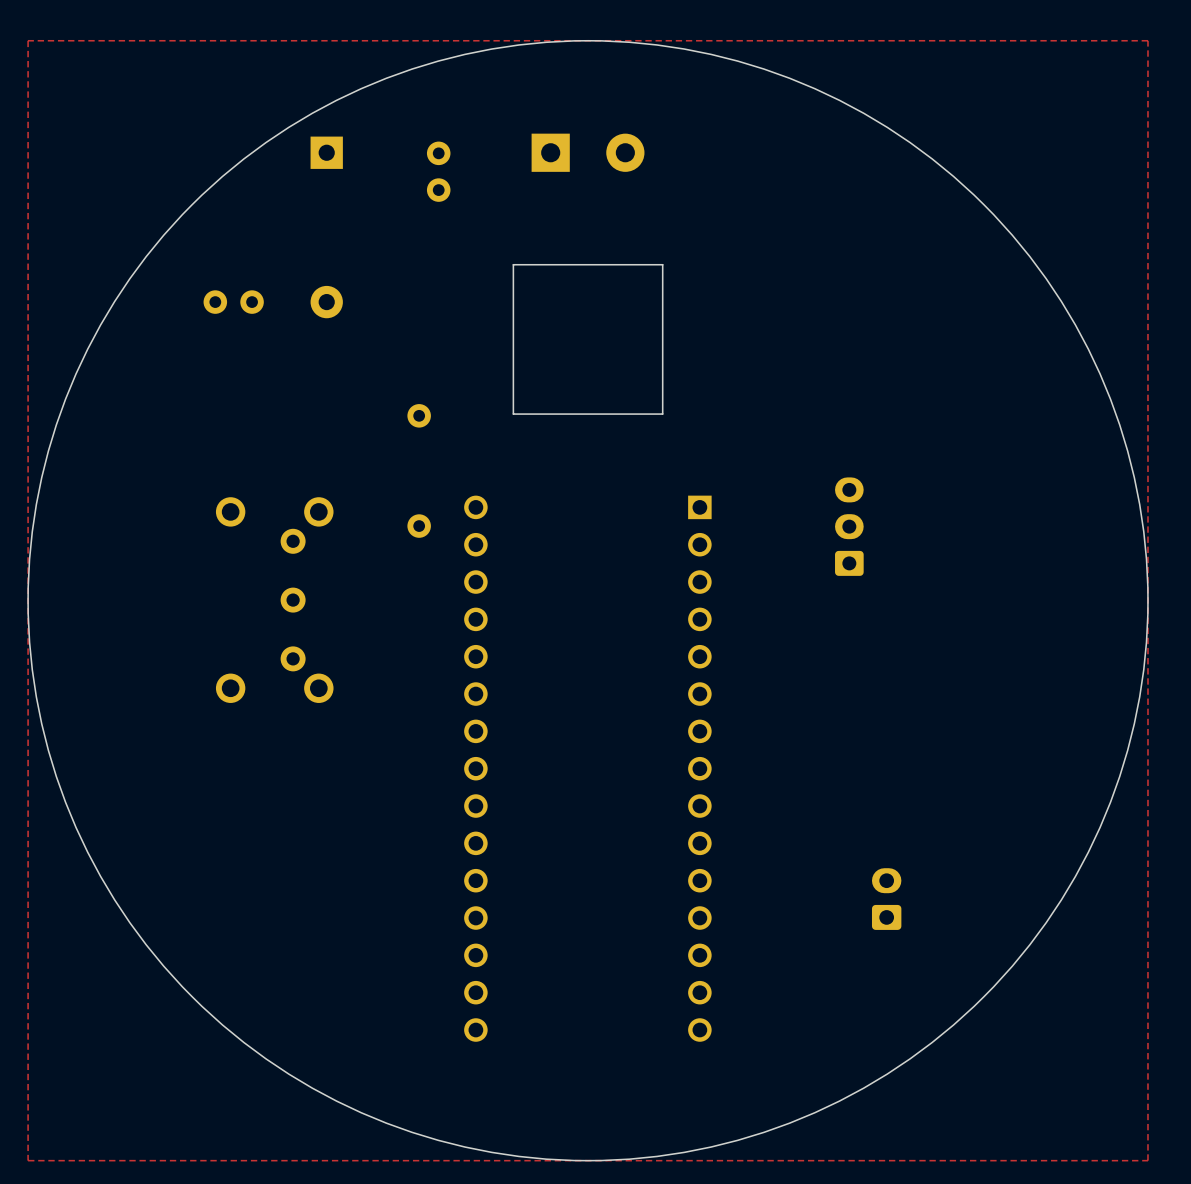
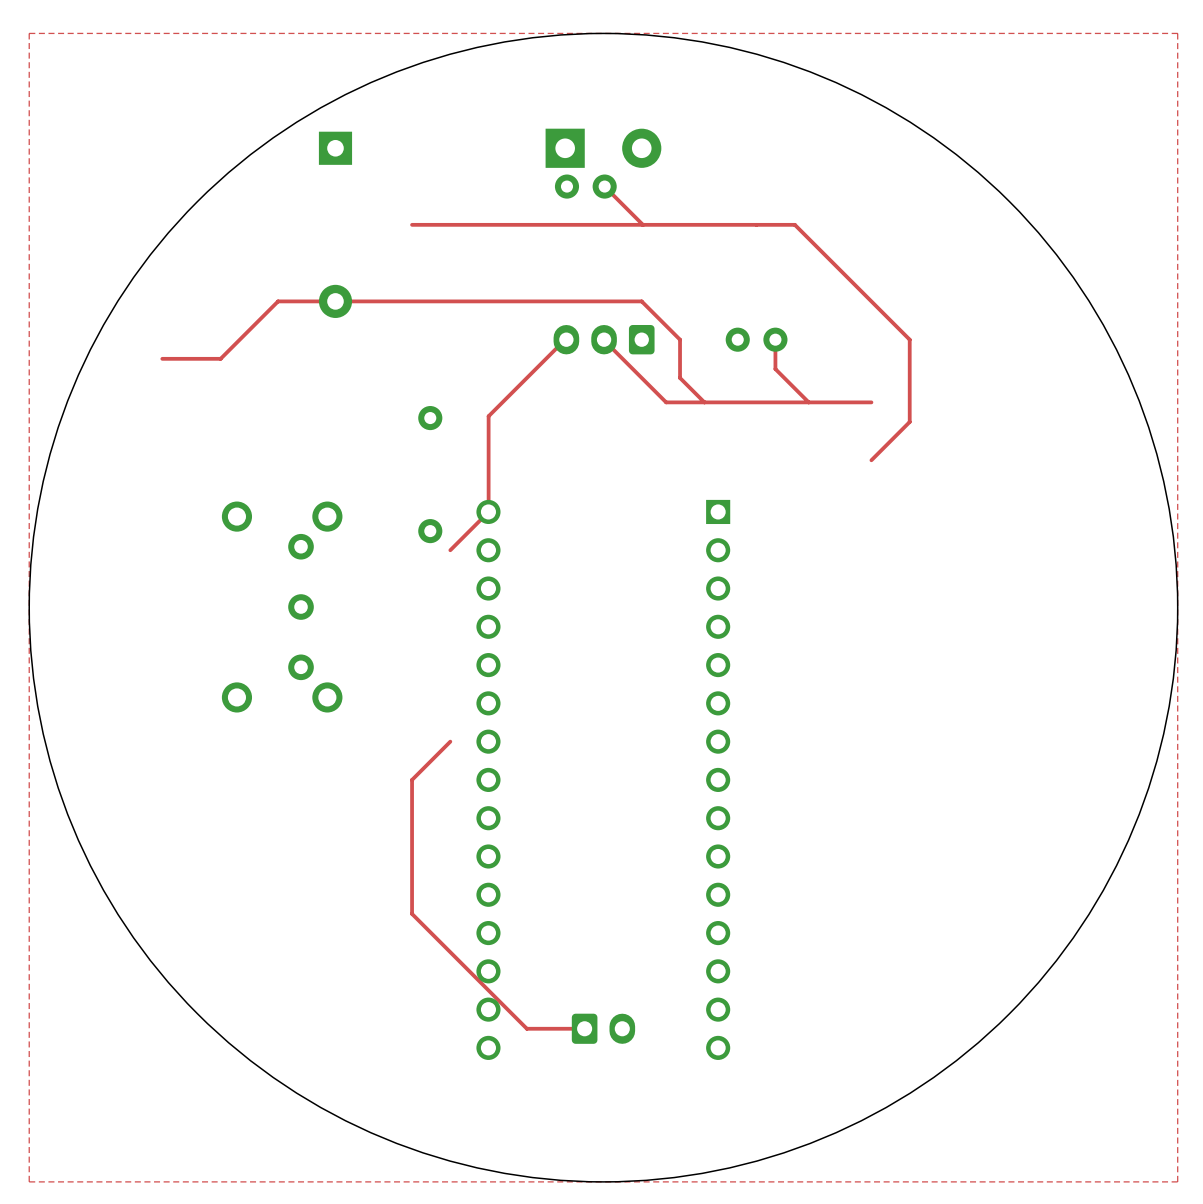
part rotation: 0° (438, 171) -> 90° clockwise (585, 186)
part position: (438, 171) -> (585, 186)
top track: none -> (604, 186) (642, 224)
top track: none -> (412, 224) (794, 224) (909, 339) (909, 421) (871, 460)
board edge: (662, 264) (662, 414) (513, 414) (513, 264) (662, 264) -> none
part: (233, 302) -> none
top track: none -> (565, 339) (488, 416) (488, 511) (450, 550)
top track: none -> (603, 339) (666, 402) (871, 402)
part: none -> (756, 339)
top track: none -> (775, 339) (775, 369) (808, 402)
top track: none -> (162, 358) (220, 358) (278, 301) (641, 301) (680, 339) (680, 377) (704, 402)
part rotation: 0° (849, 526) -> 90° counterclockwise (604, 339)
part position: (849, 526) -> (604, 339)
top track: none -> (450, 741) (412, 779) (412, 913) (526, 1028) (584, 1028)
part rotation: 0° (886, 899) -> 90° clockwise (603, 1028)
part position: (886, 899) -> (603, 1028)

